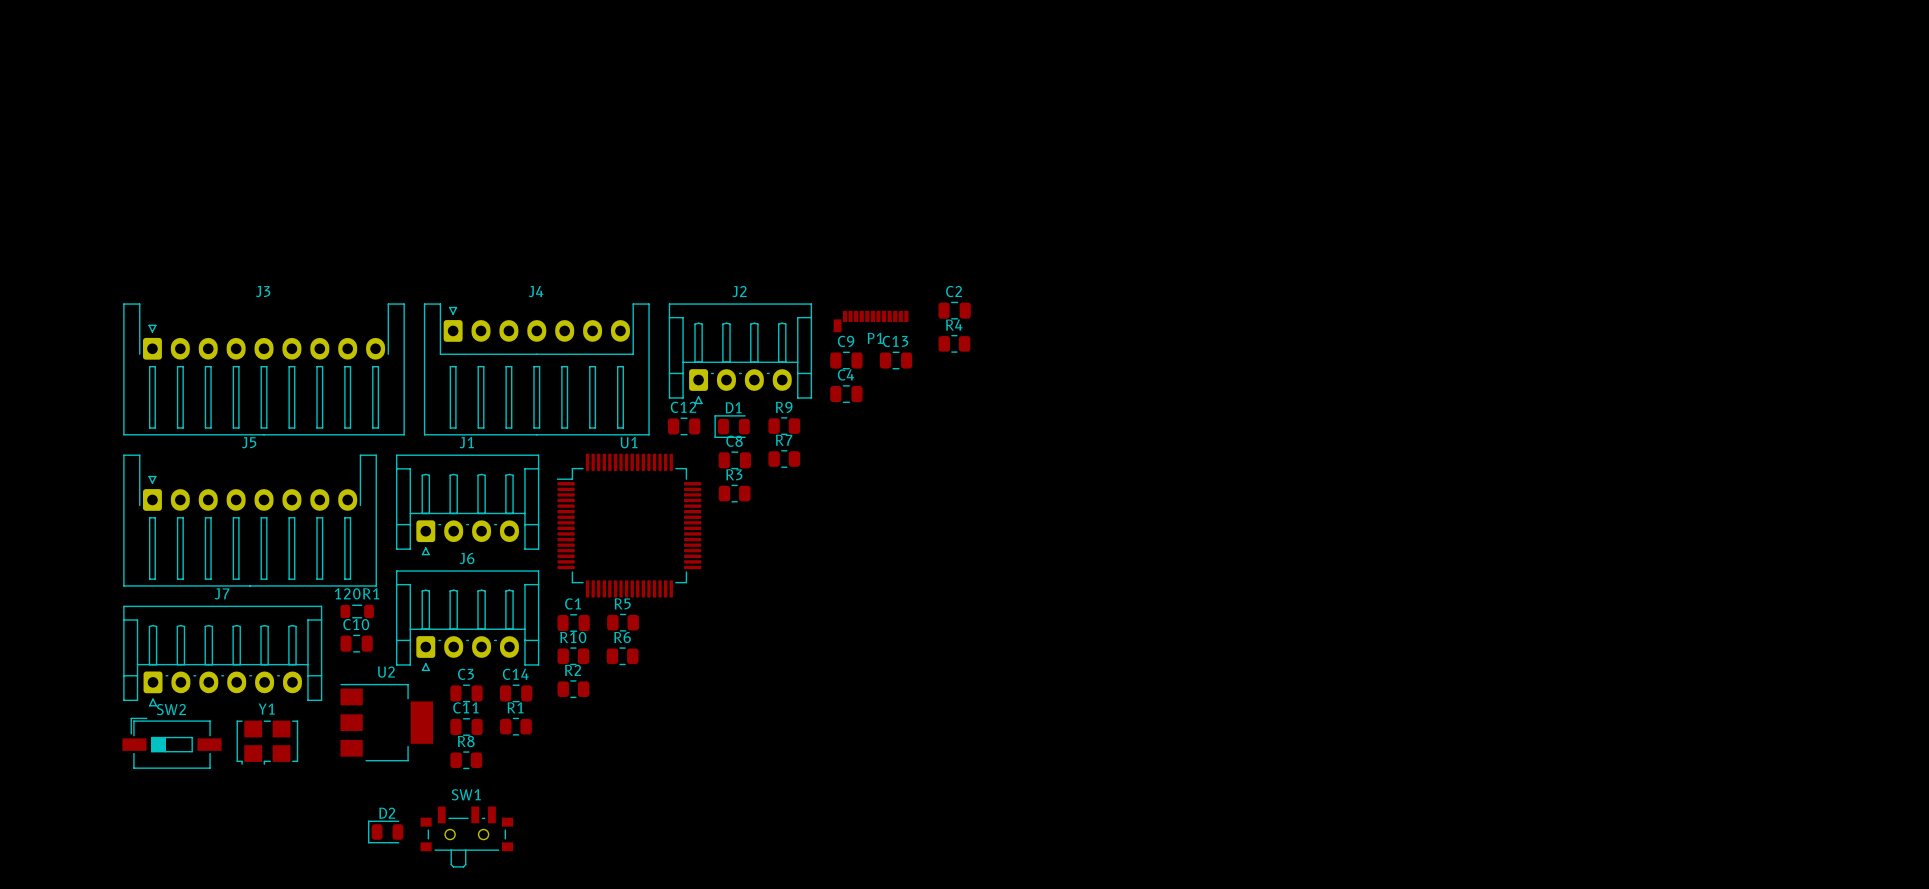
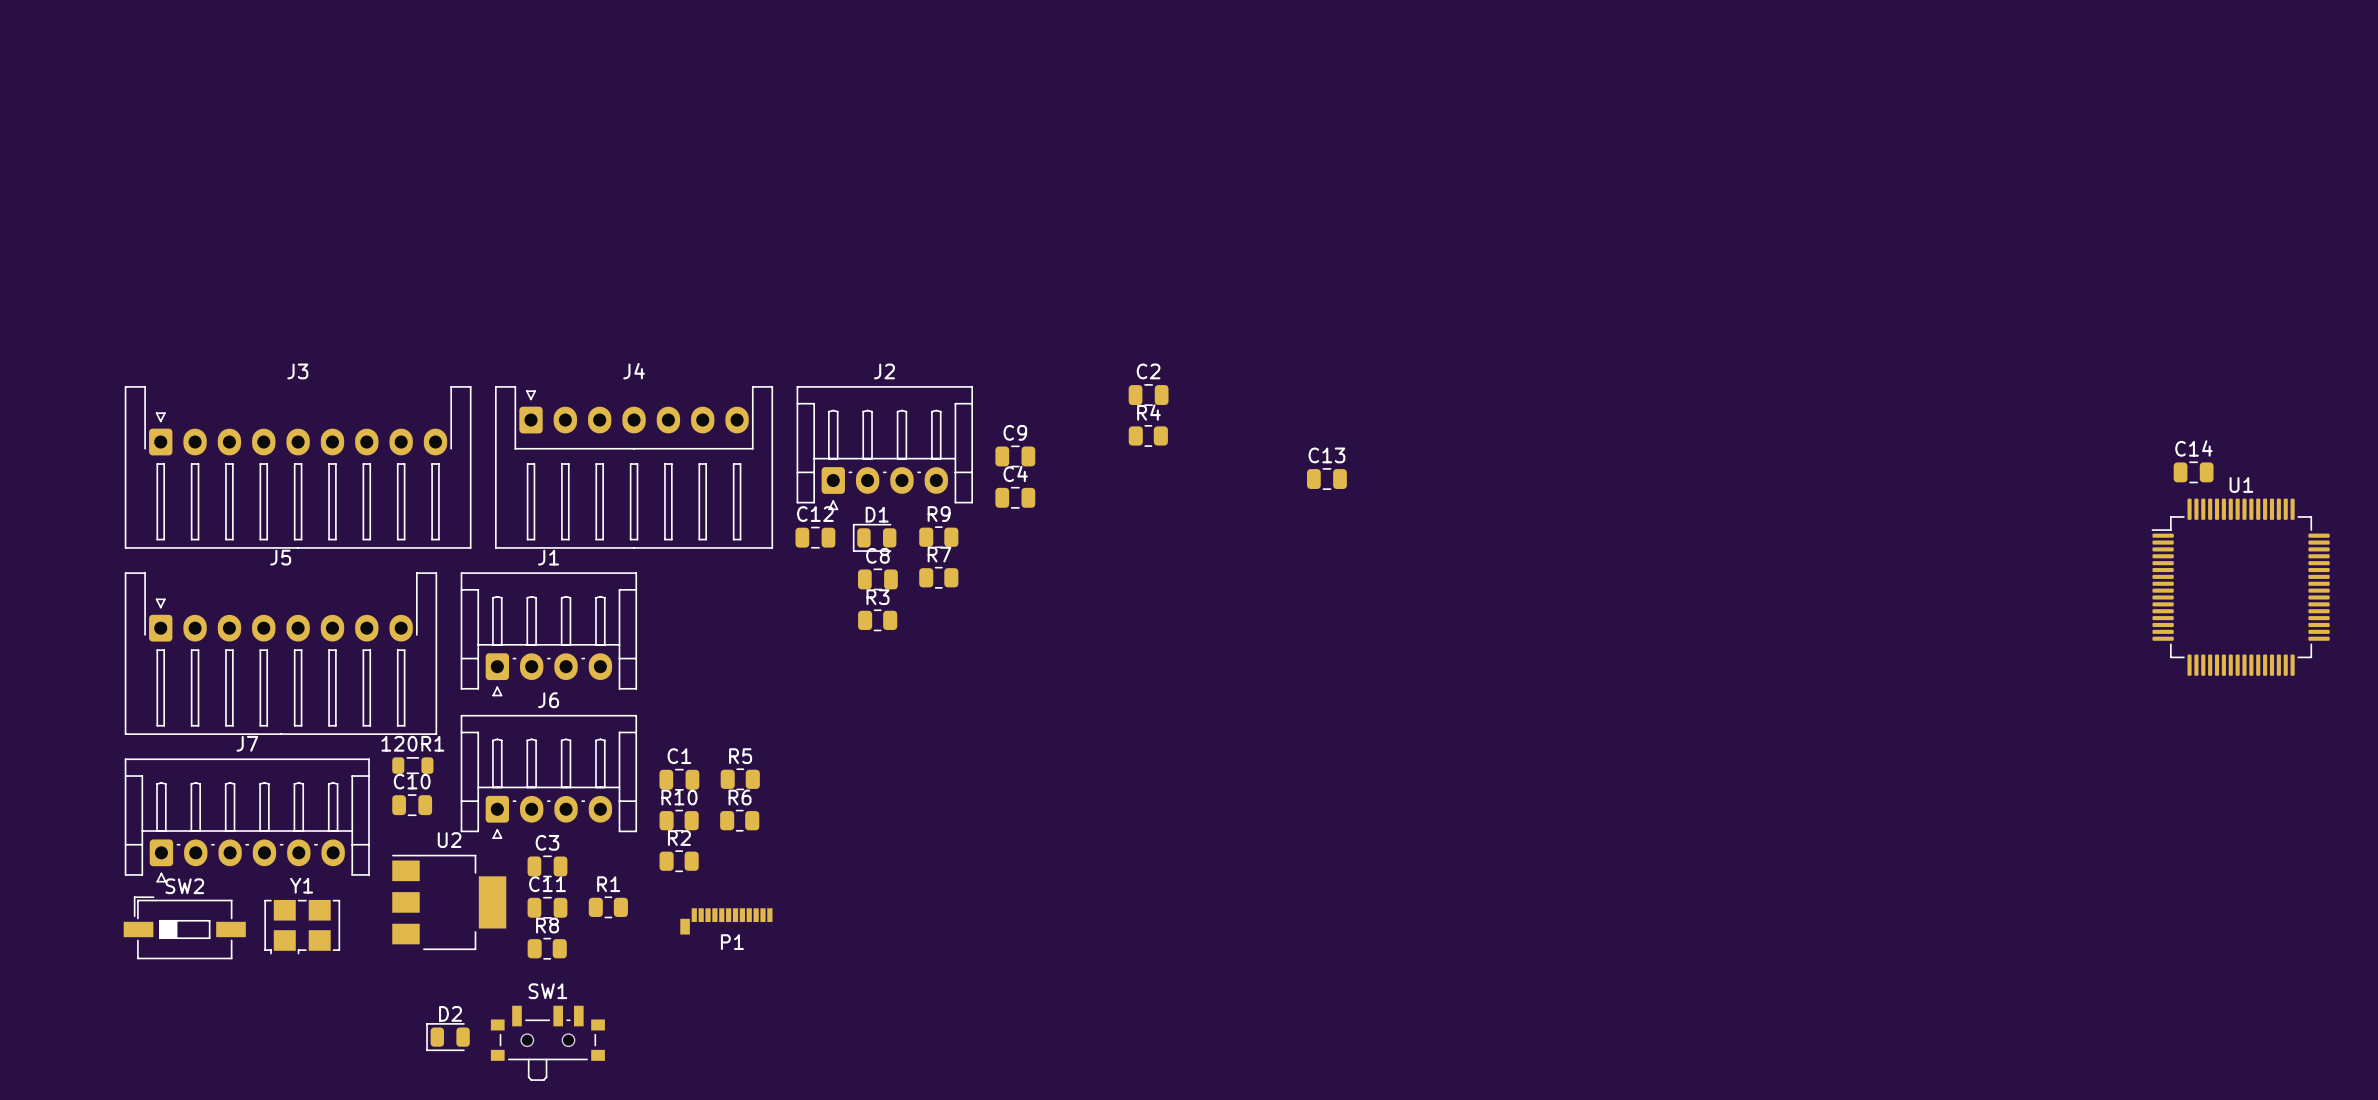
P1 position: (871, 321) -> (726, 921)
C13 position: (896, 360) -> (1326, 479)
U1 position: (629, 525) -> (2240, 587)
C14 position: (516, 693) -> (2193, 472)

